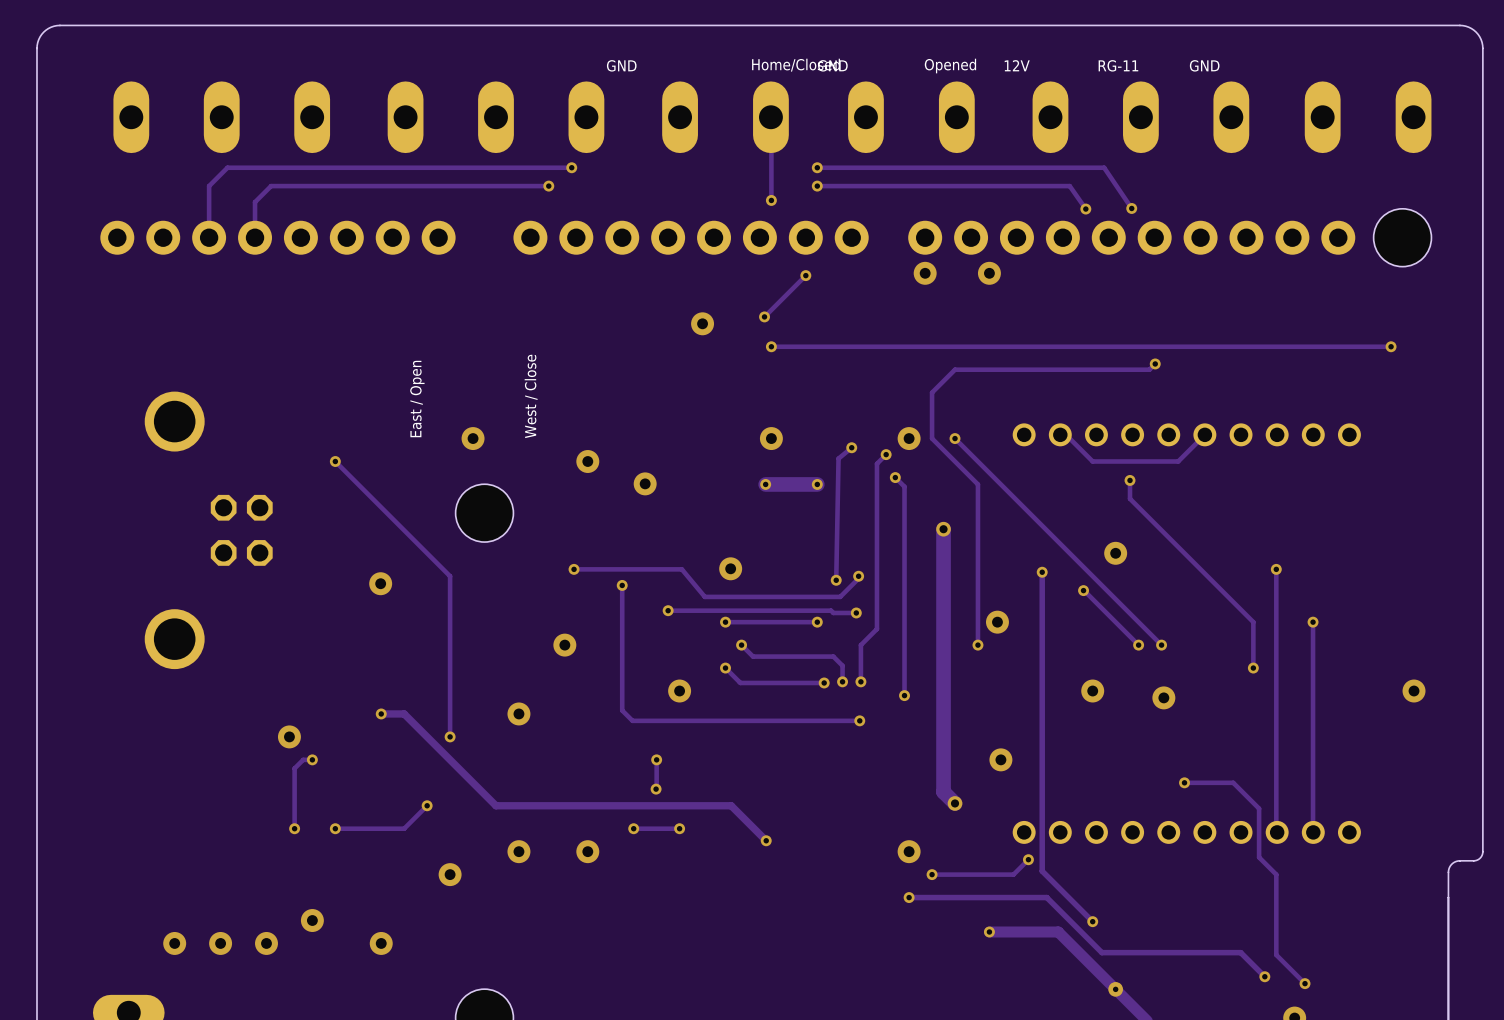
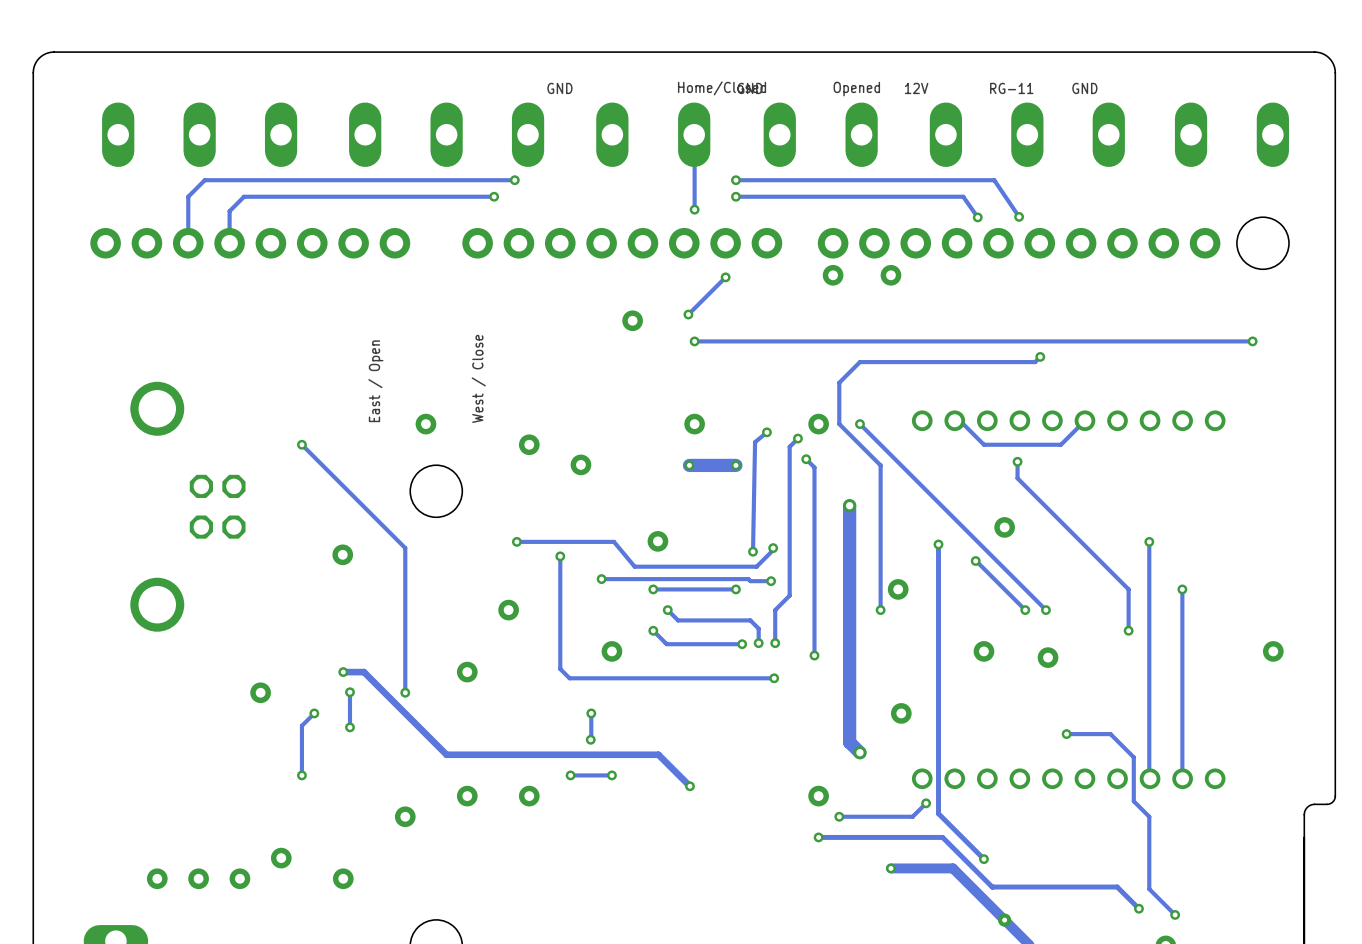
track: none -> (349, 692) (349, 727)
via: none -> (349, 692)
track: (312, 759) (303, 759) (294, 768) (294, 828) -> none
via position: (312, 759) -> (314, 713)
via: none -> (349, 727)
track: (427, 805) (404, 828) (335, 828) -> (314, 713) (301, 725) (301, 775)
via: (427, 805) -> none
via: (294, 828) -> none

